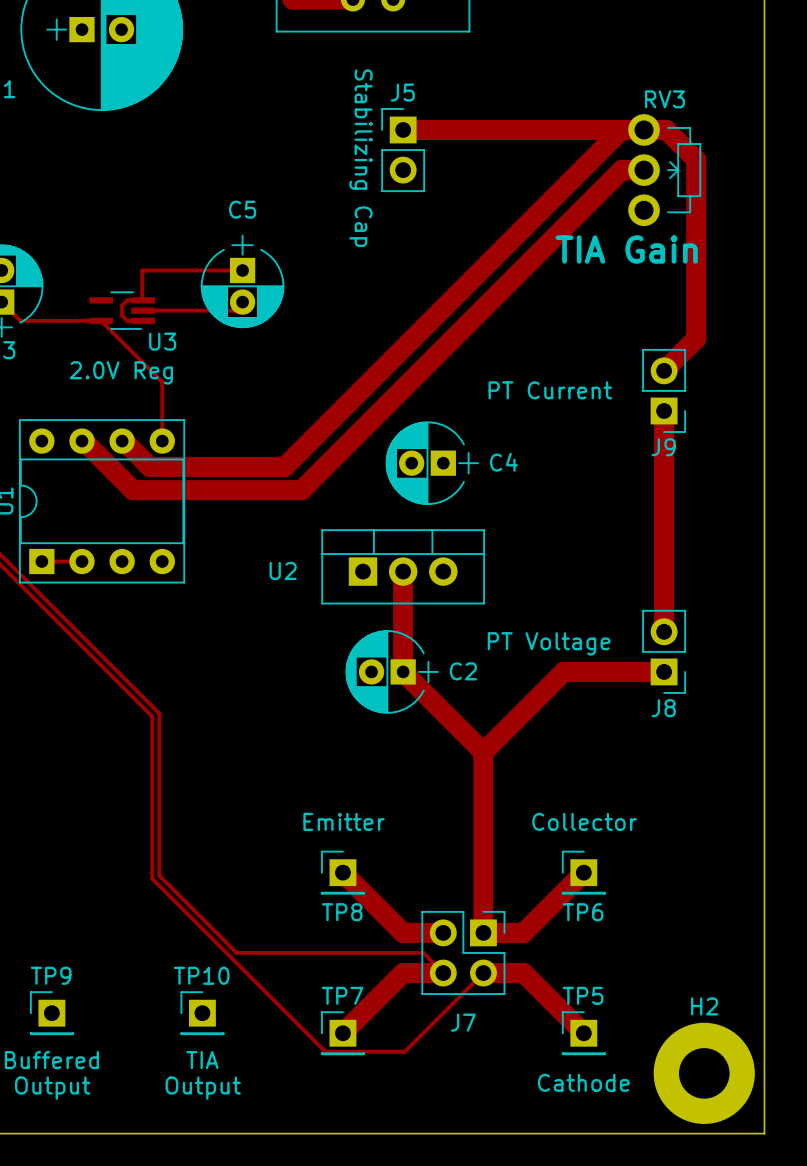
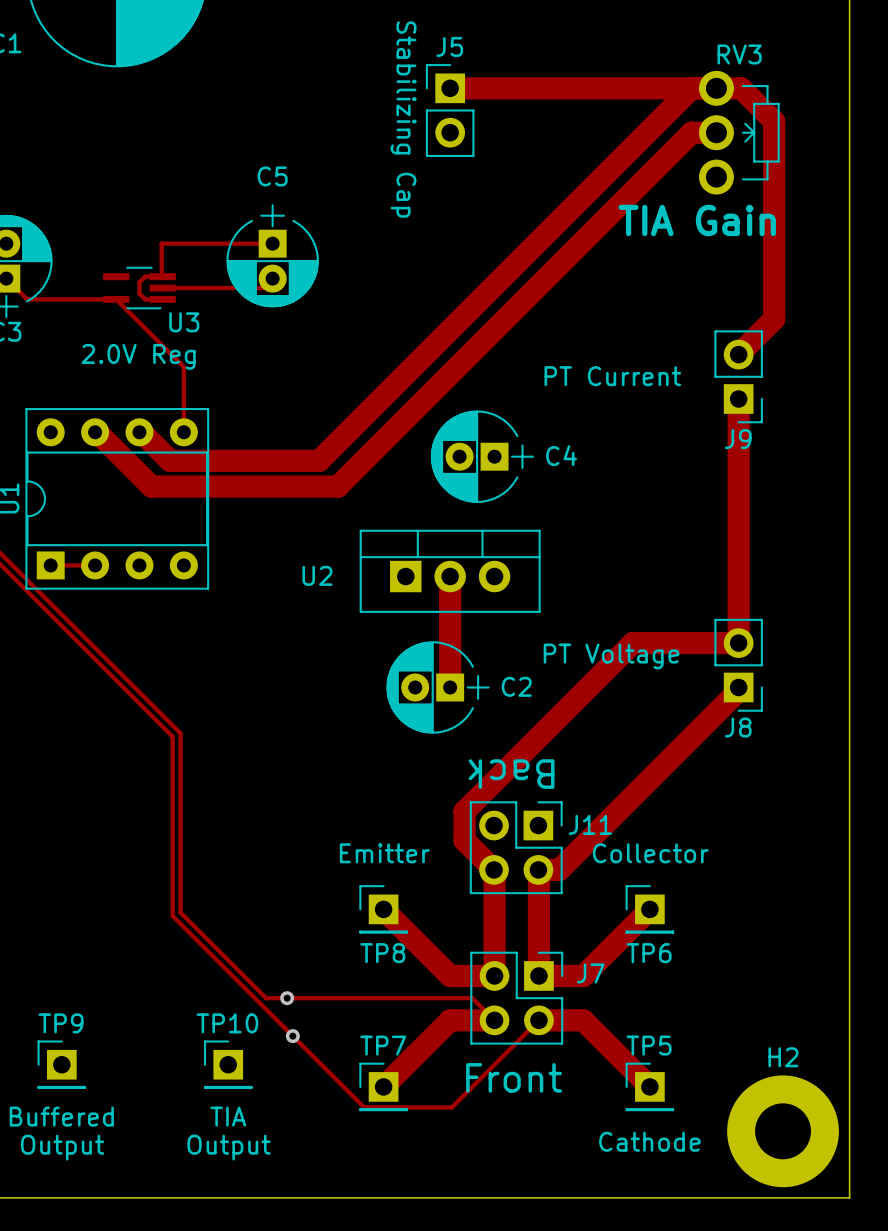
track: none -> (738, 643) (632, 643) (464, 811) (464, 840) (494, 870) (494, 975)
track: (403, 671) (483, 752) -> none
track: (664, 671) (563, 671) (483, 752) -> (738, 687) (738, 690) (559, 869) (538, 870)
text: none -> Back (511, 774)
track: (483, 752) (483, 837) -> none
J11: none -> (516, 847)
via: none -> (287, 998)
via: none -> (292, 1036)
J7 name position: J7 (463, 1022) -> J7 (590, 973)
text: none -> Front (514, 1077)

